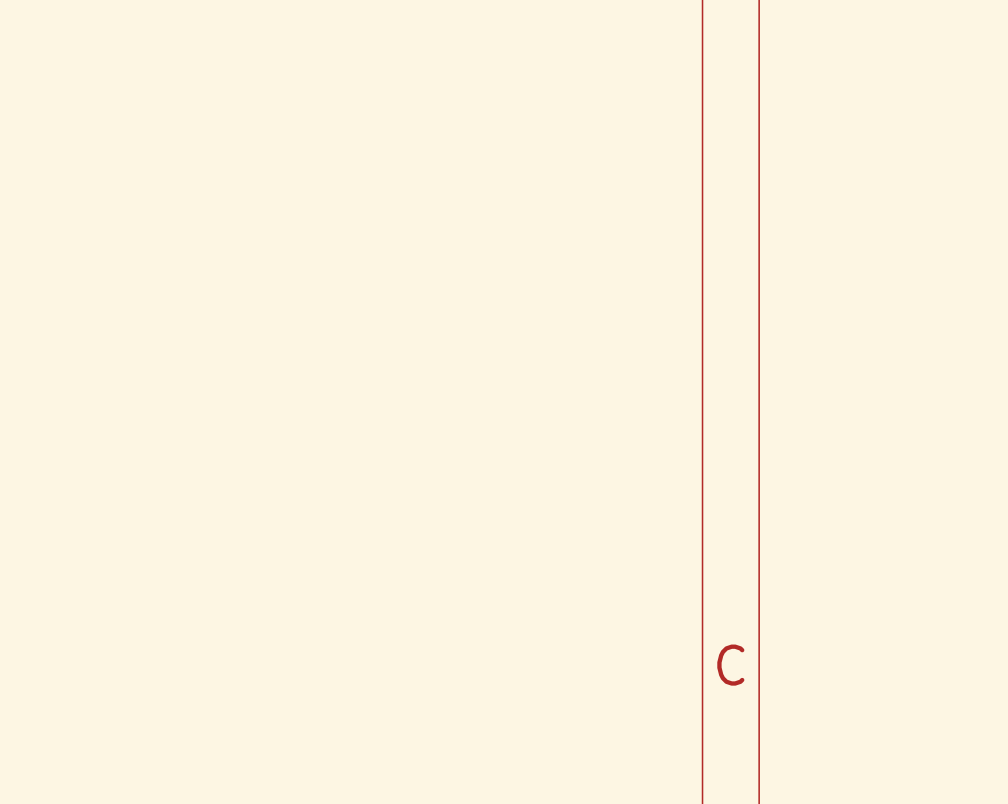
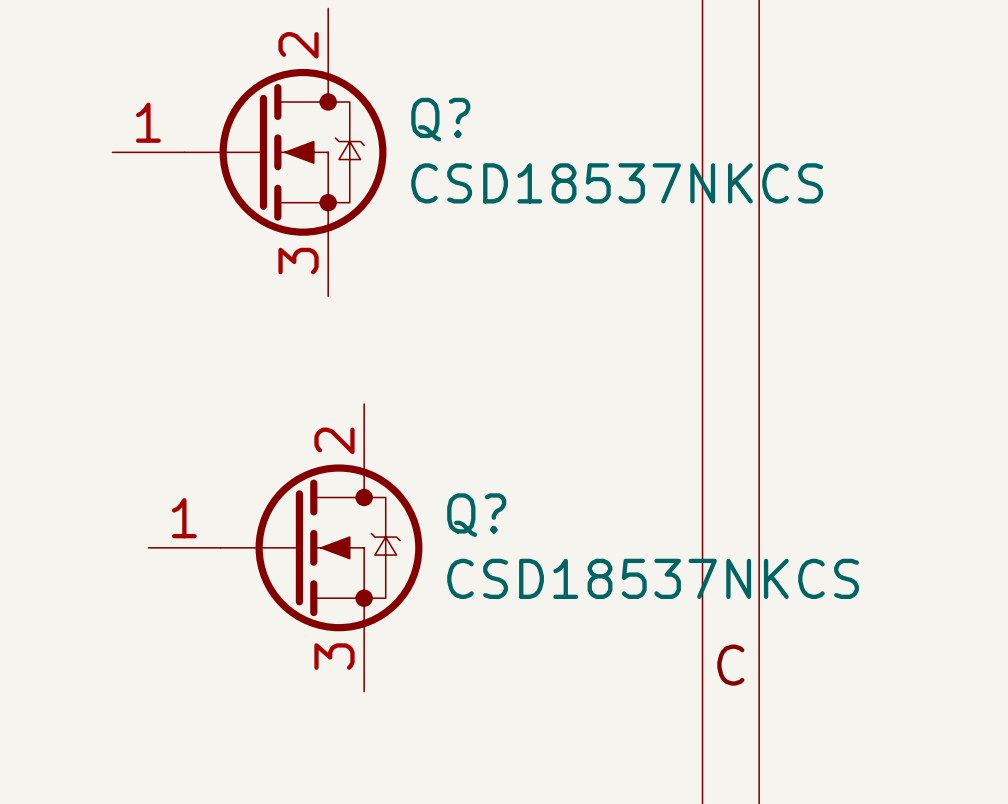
Q?: none -> CSD18537NKCS (249, 152)
Q?: none -> CSD18537NKCS (285, 547)

